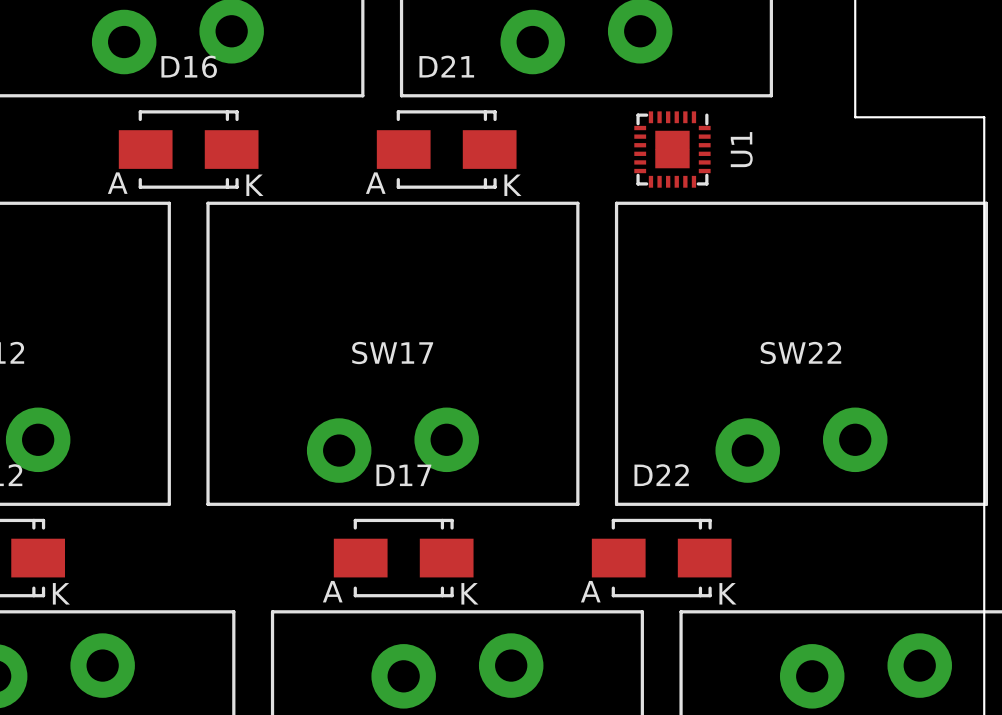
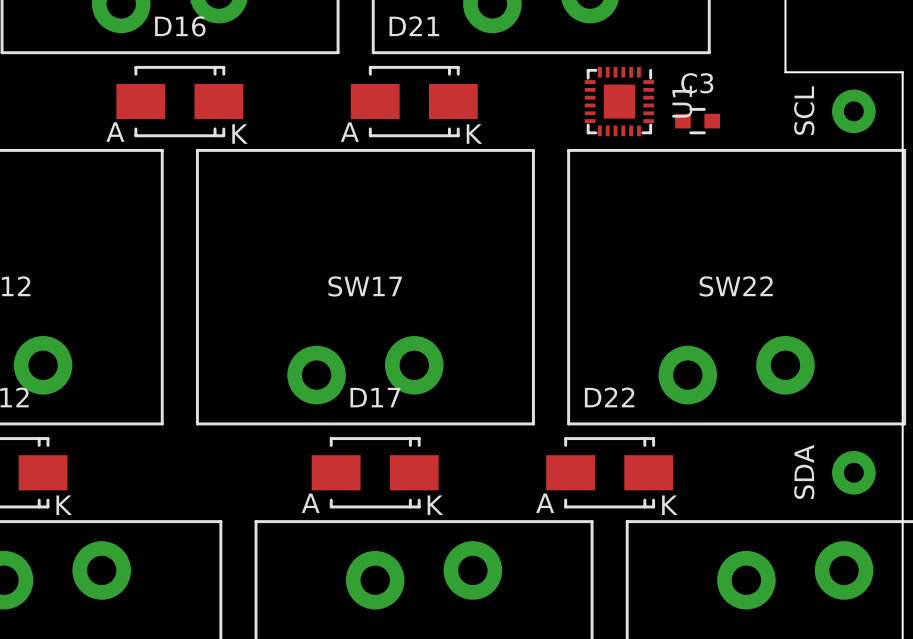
part: none -> SCL (853, 111)
C3: none -> (697, 121)
part: none -> SDA (853, 472)

